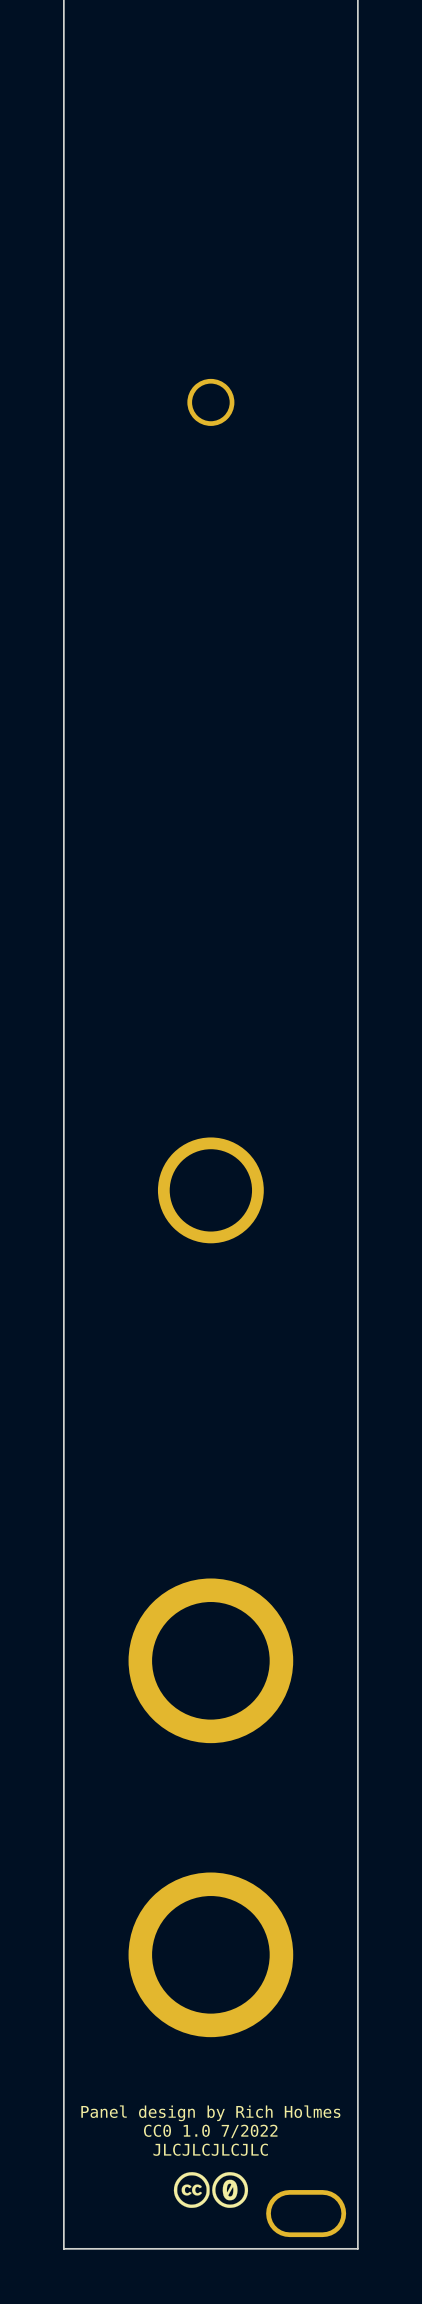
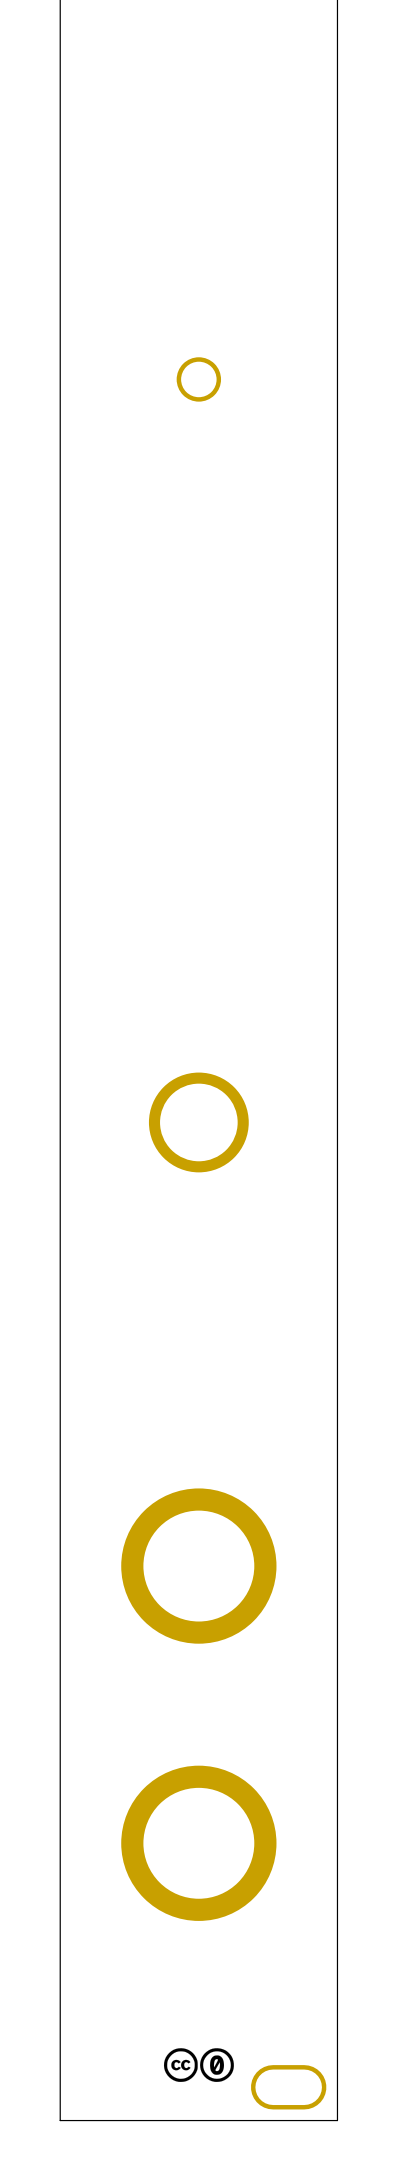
text: Panel design by Rich Holmes (210, 2113) -> none
text: CC0 1.0 7/2022 (210, 2131) -> none
text: JLCJLCJLCJLC (210, 2149) -> none

